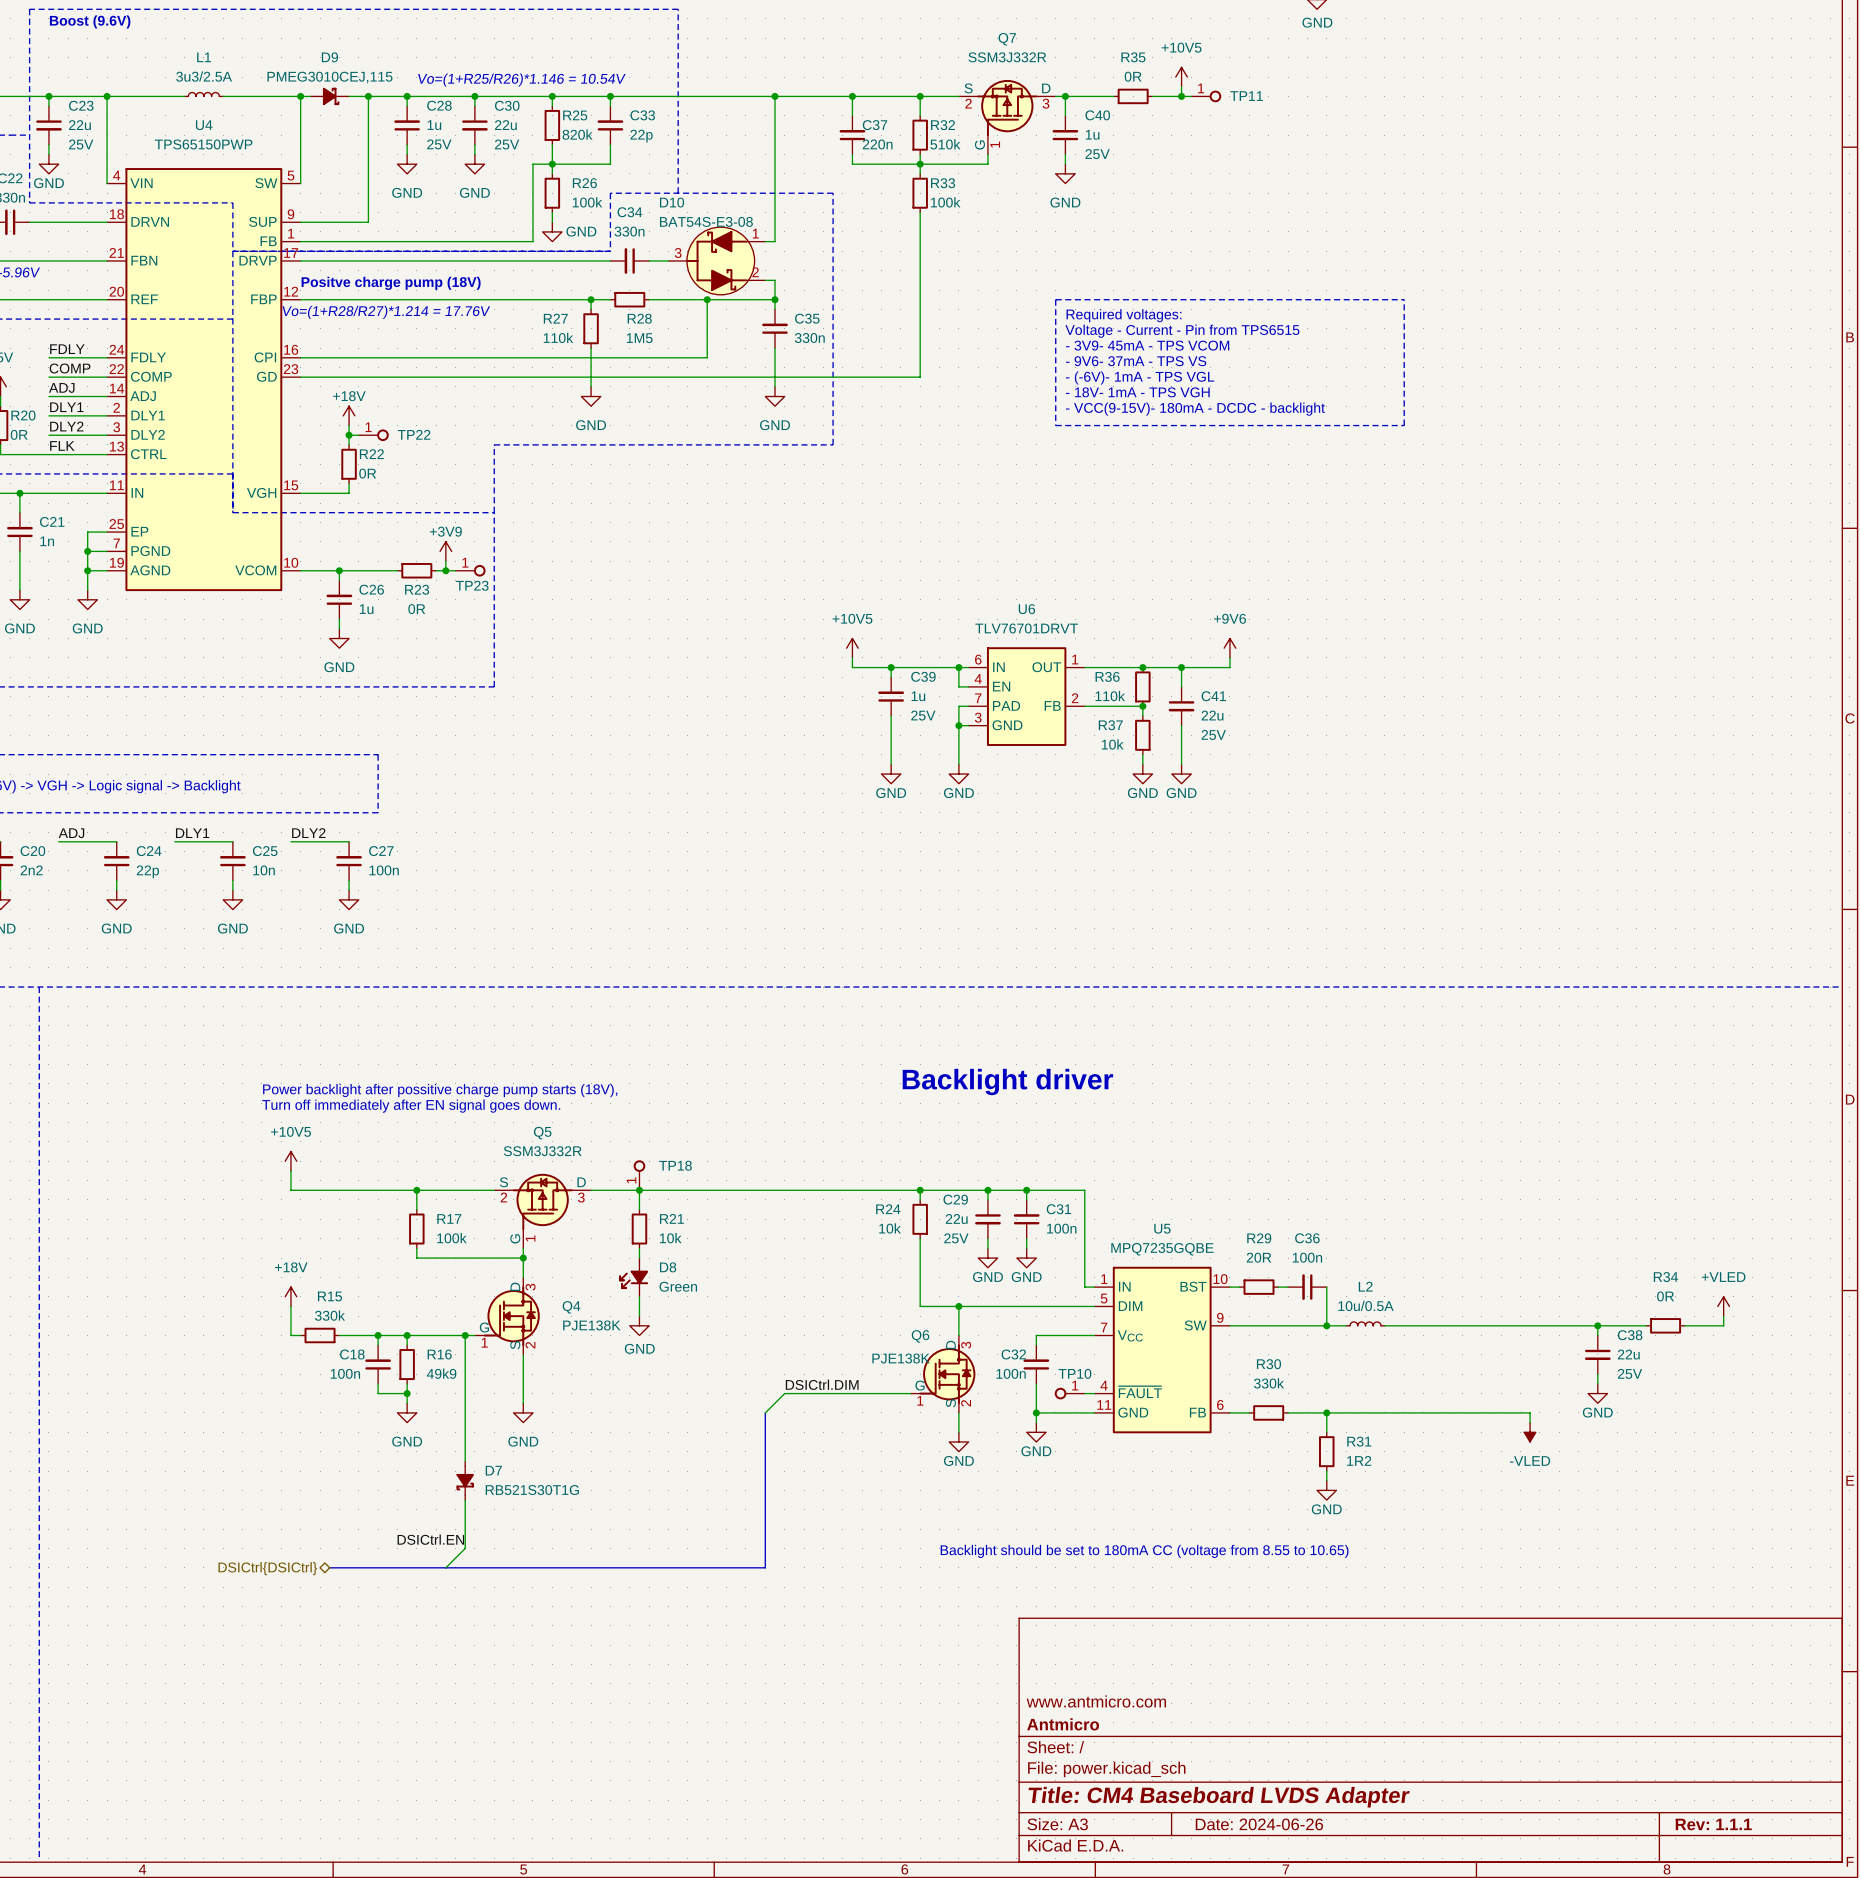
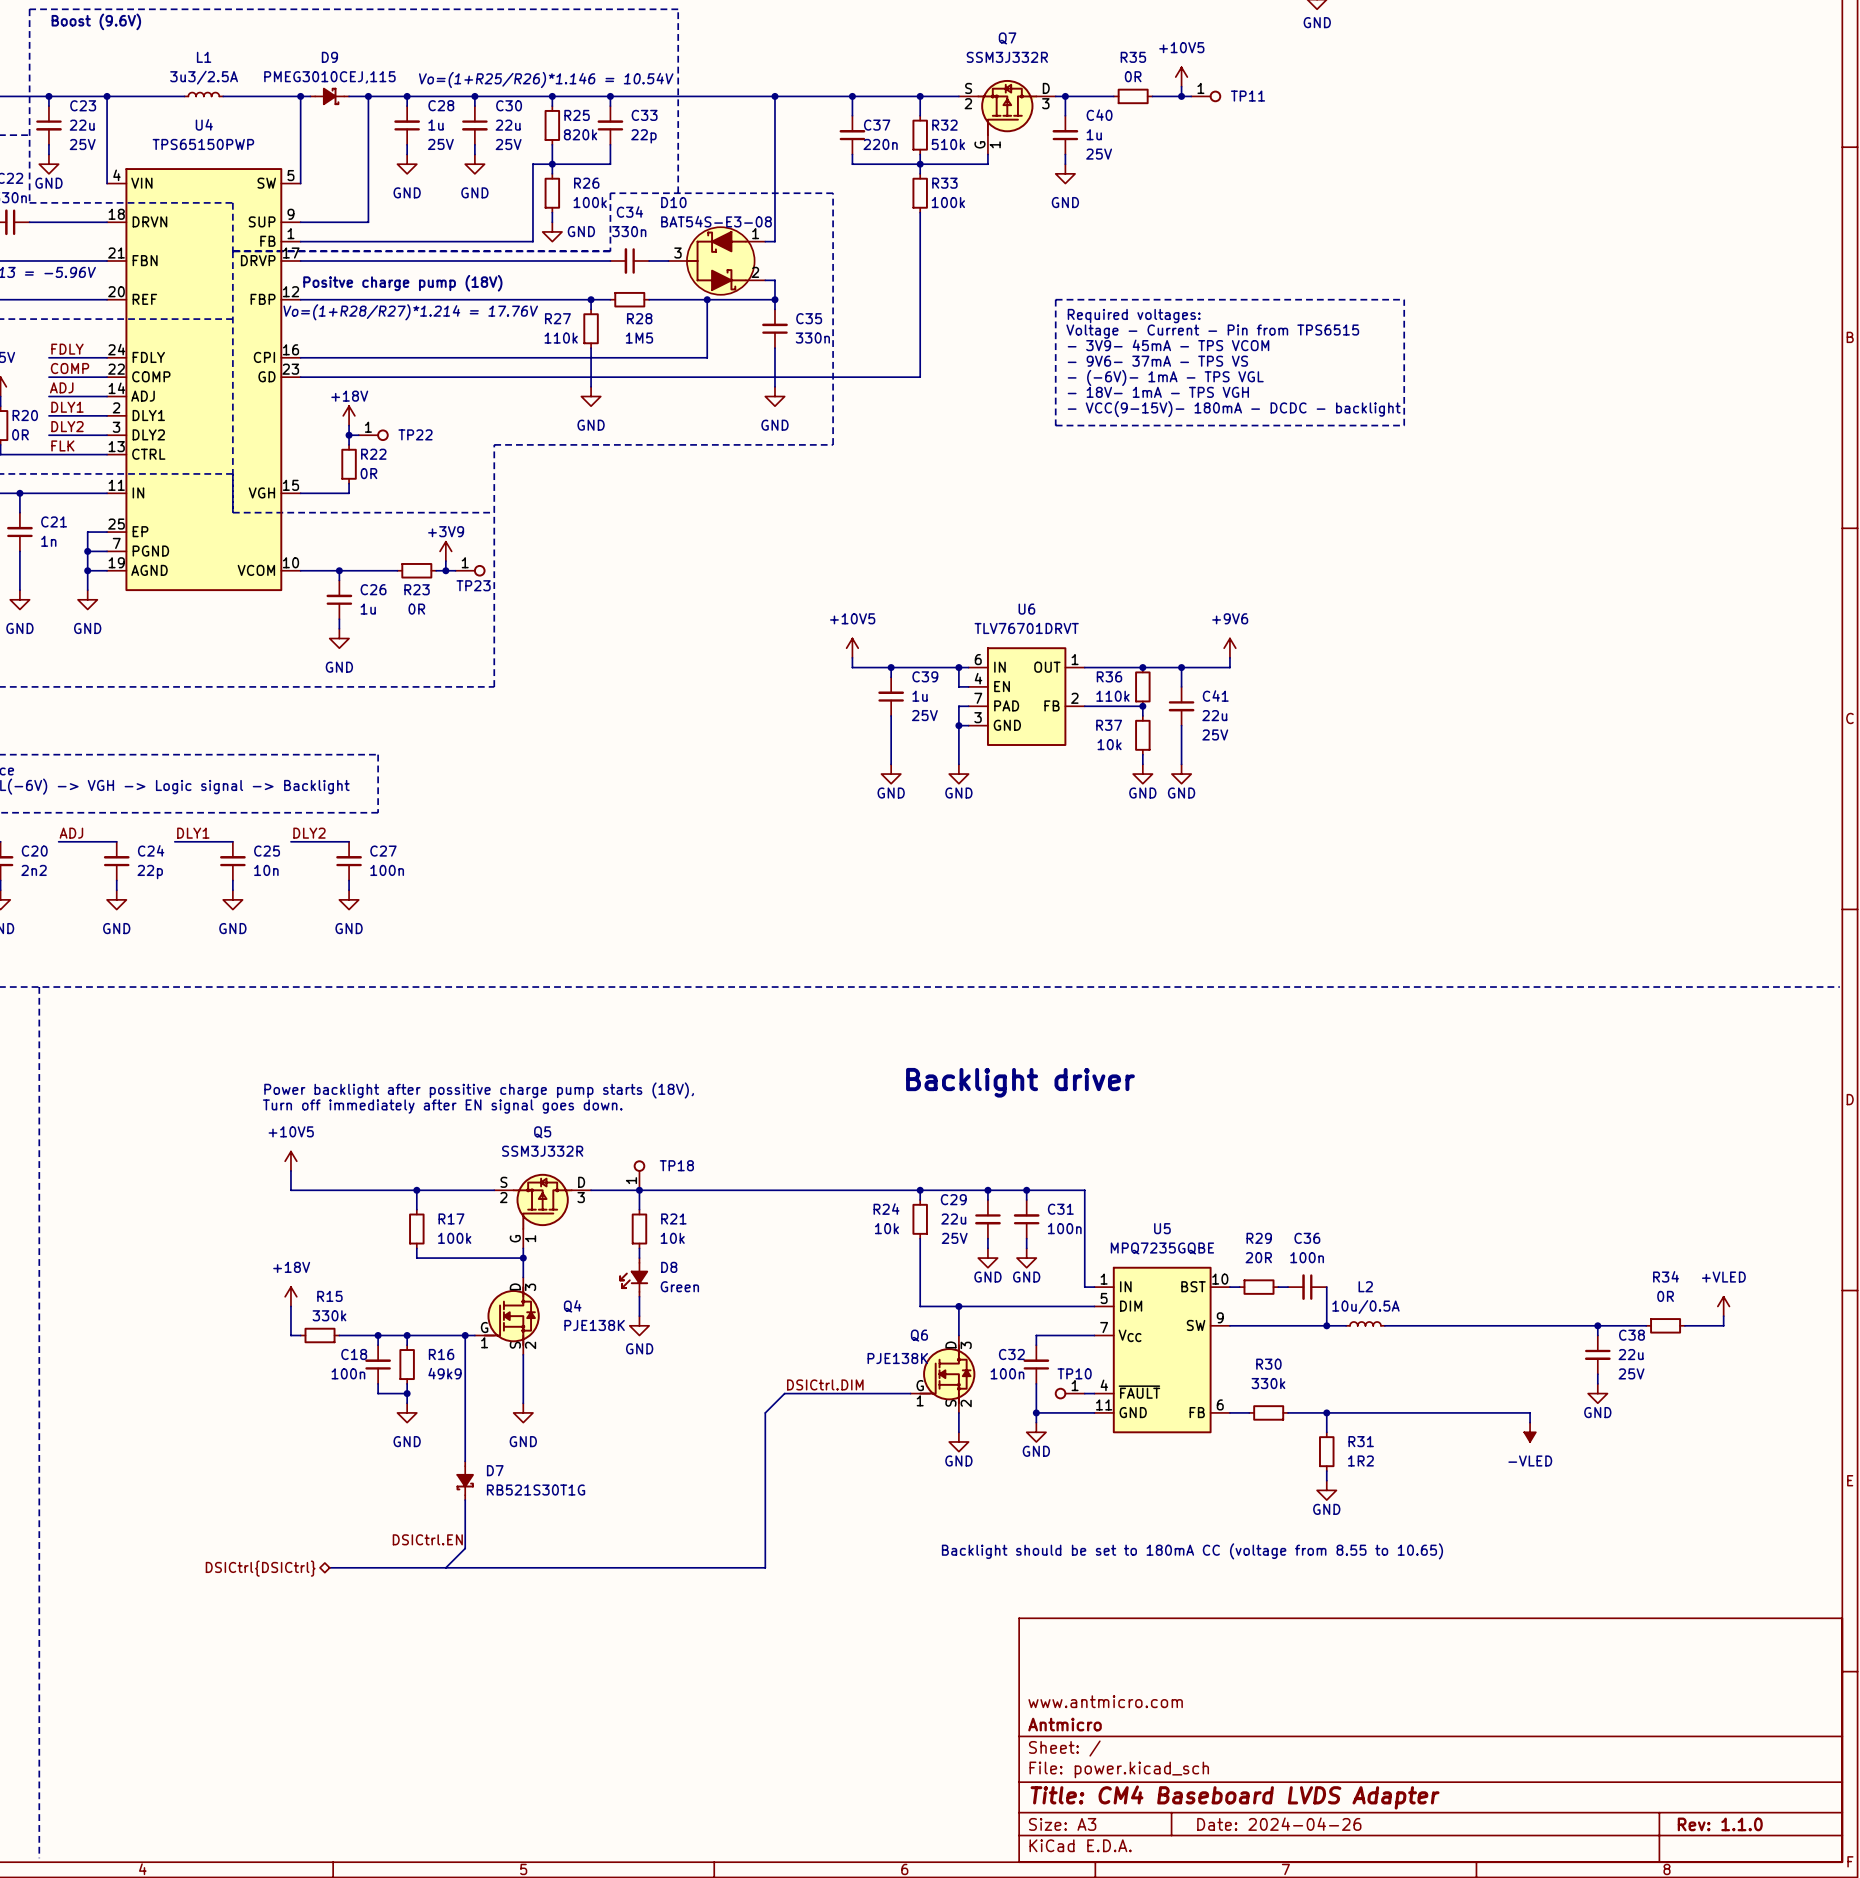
title block: Date: 2024-06-26 (1259, 1824) -> Date: 2024-04-26 (1279, 1824)
title block: Rev: 1.1.1 (1713, 1824) -> Rev: 1.1.0 (1720, 1824)

